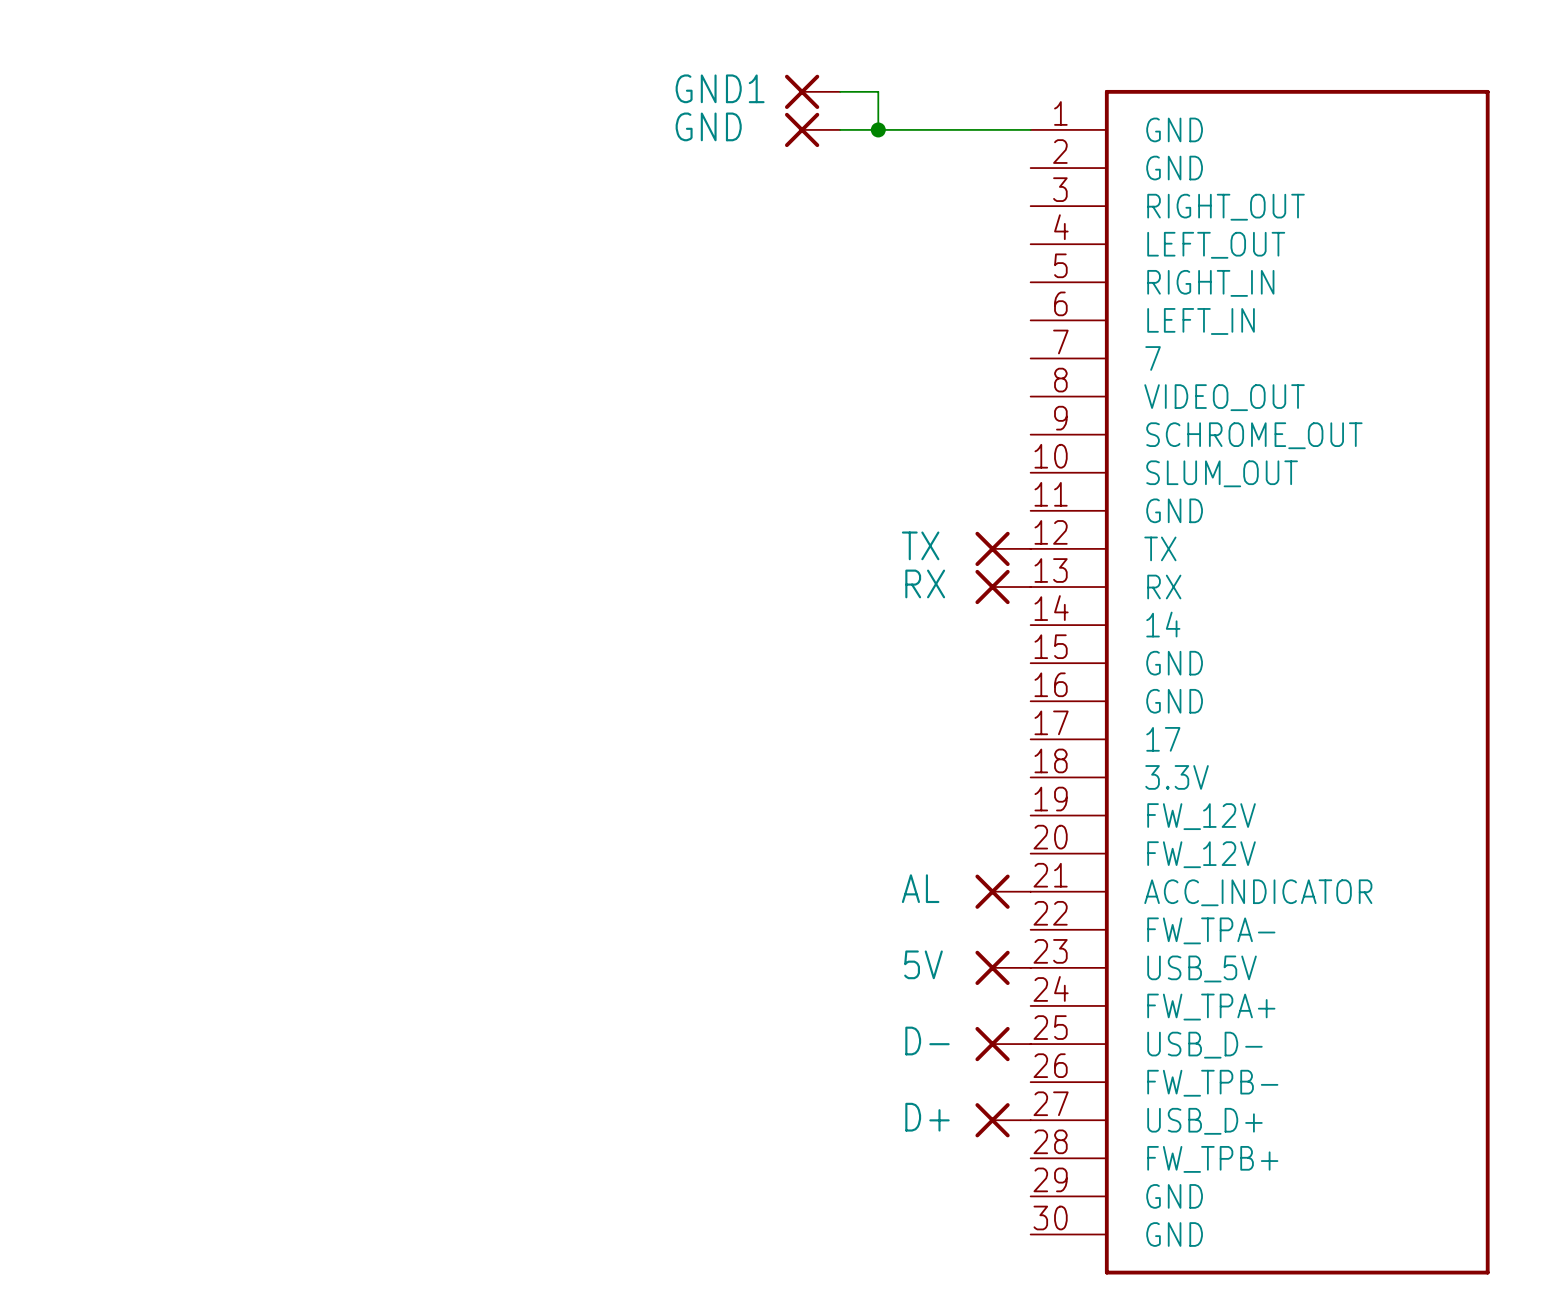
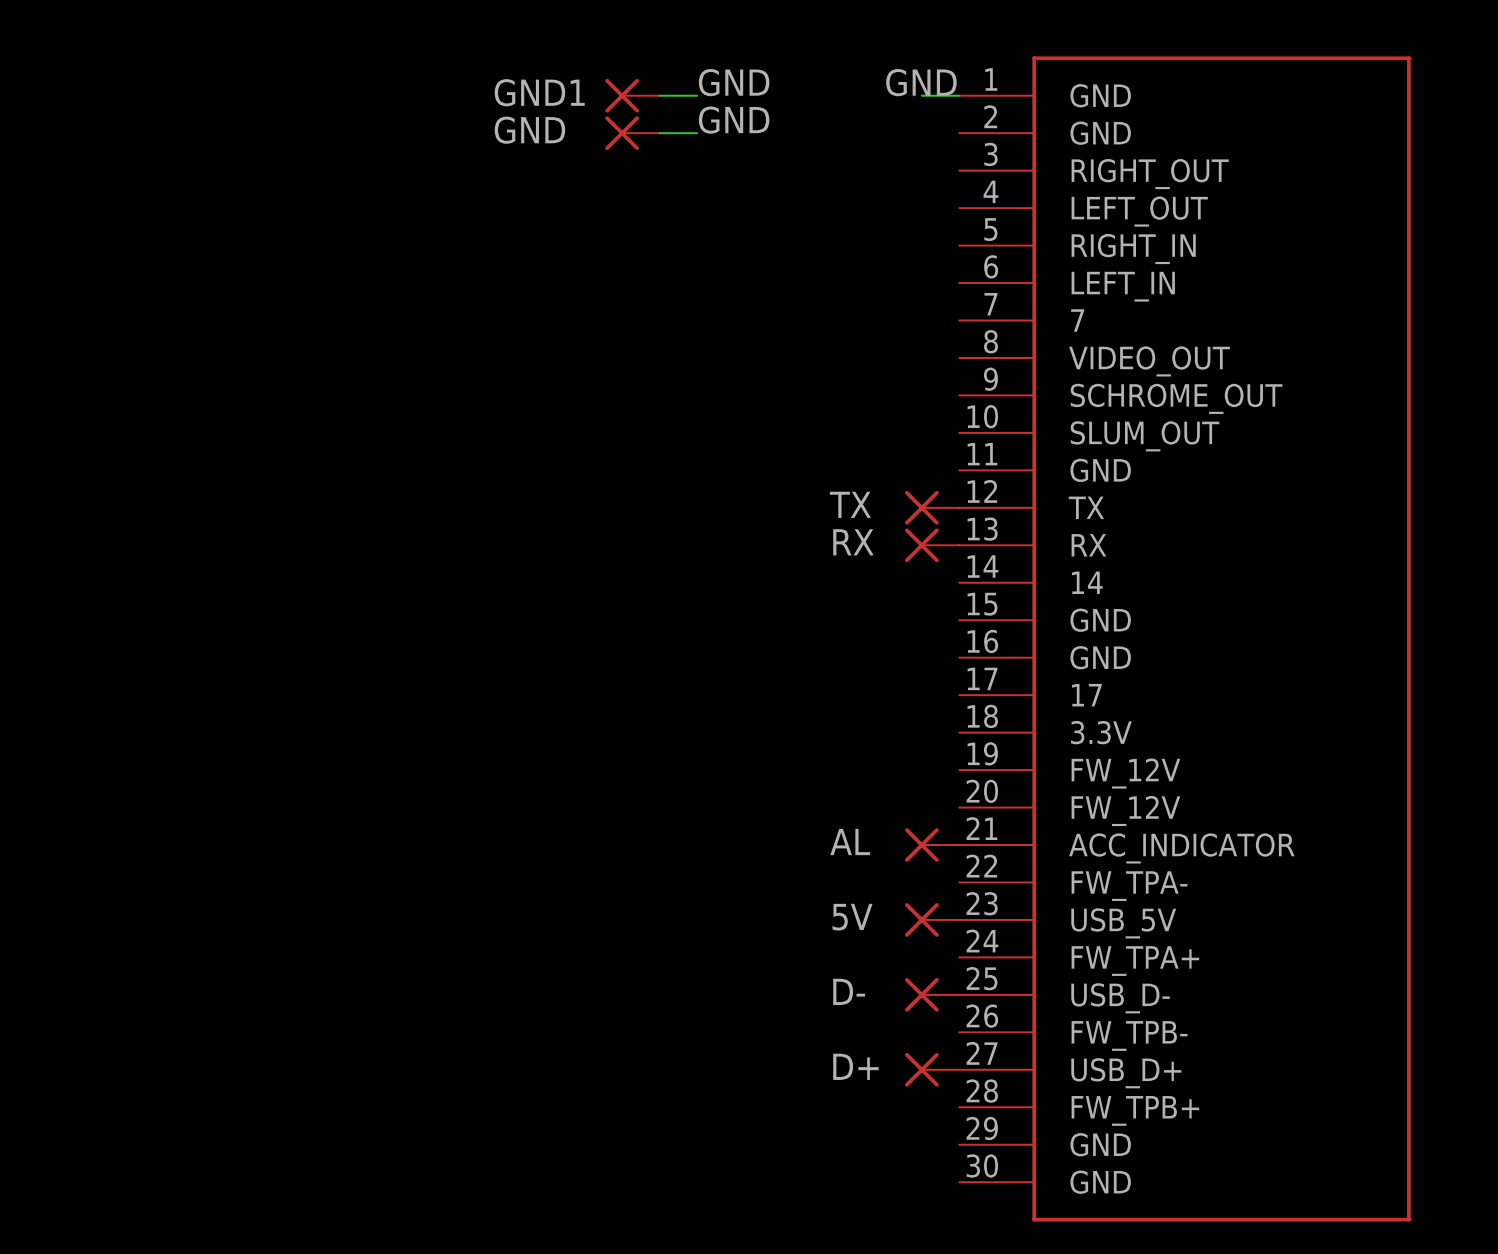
GND1 position: (812, 91) -> (632, 95)
wire: (840, 91) (878, 91) (878, 129) -> none
label: none -> GND (734, 82)
label: none -> GND (921, 82)
wire: none -> (659, 95) (697, 95)
GND position: (812, 129) -> (632, 133)
wire: (840, 129) (992, 129) -> none
junction: (878, 129) -> none
label: none -> GND (734, 120)
wire: none -> (659, 133) (697, 133)

